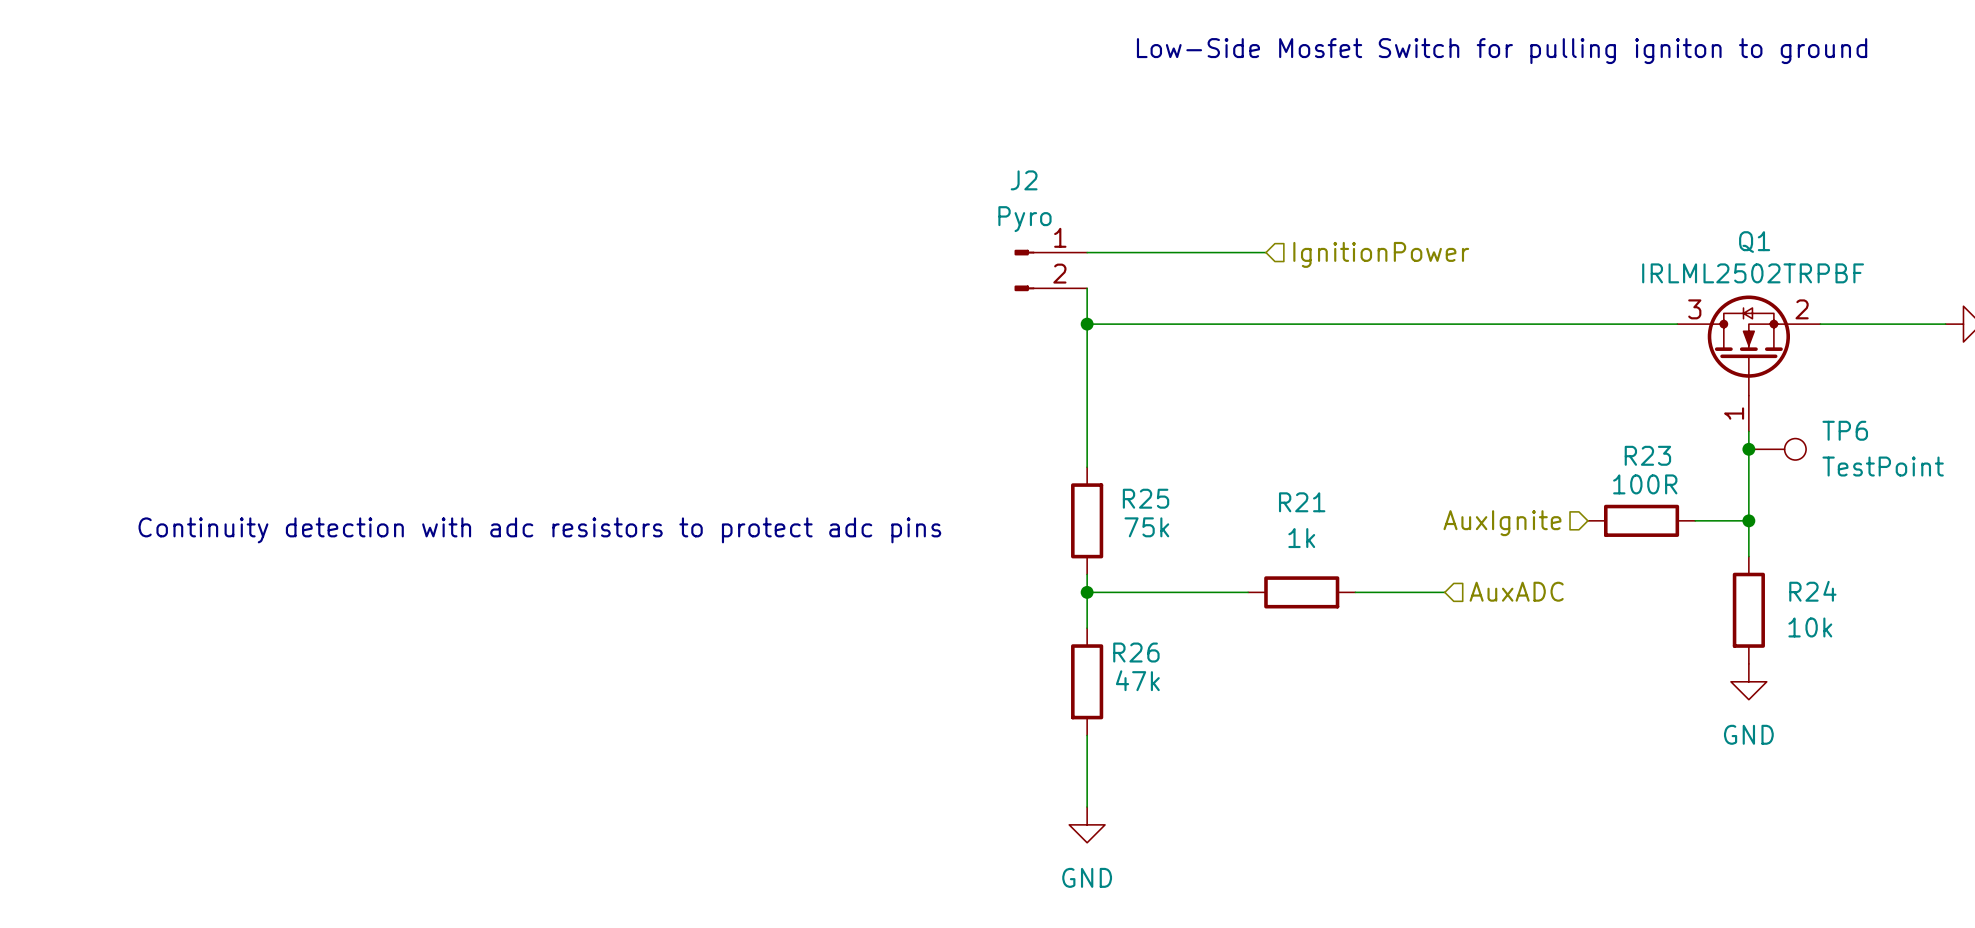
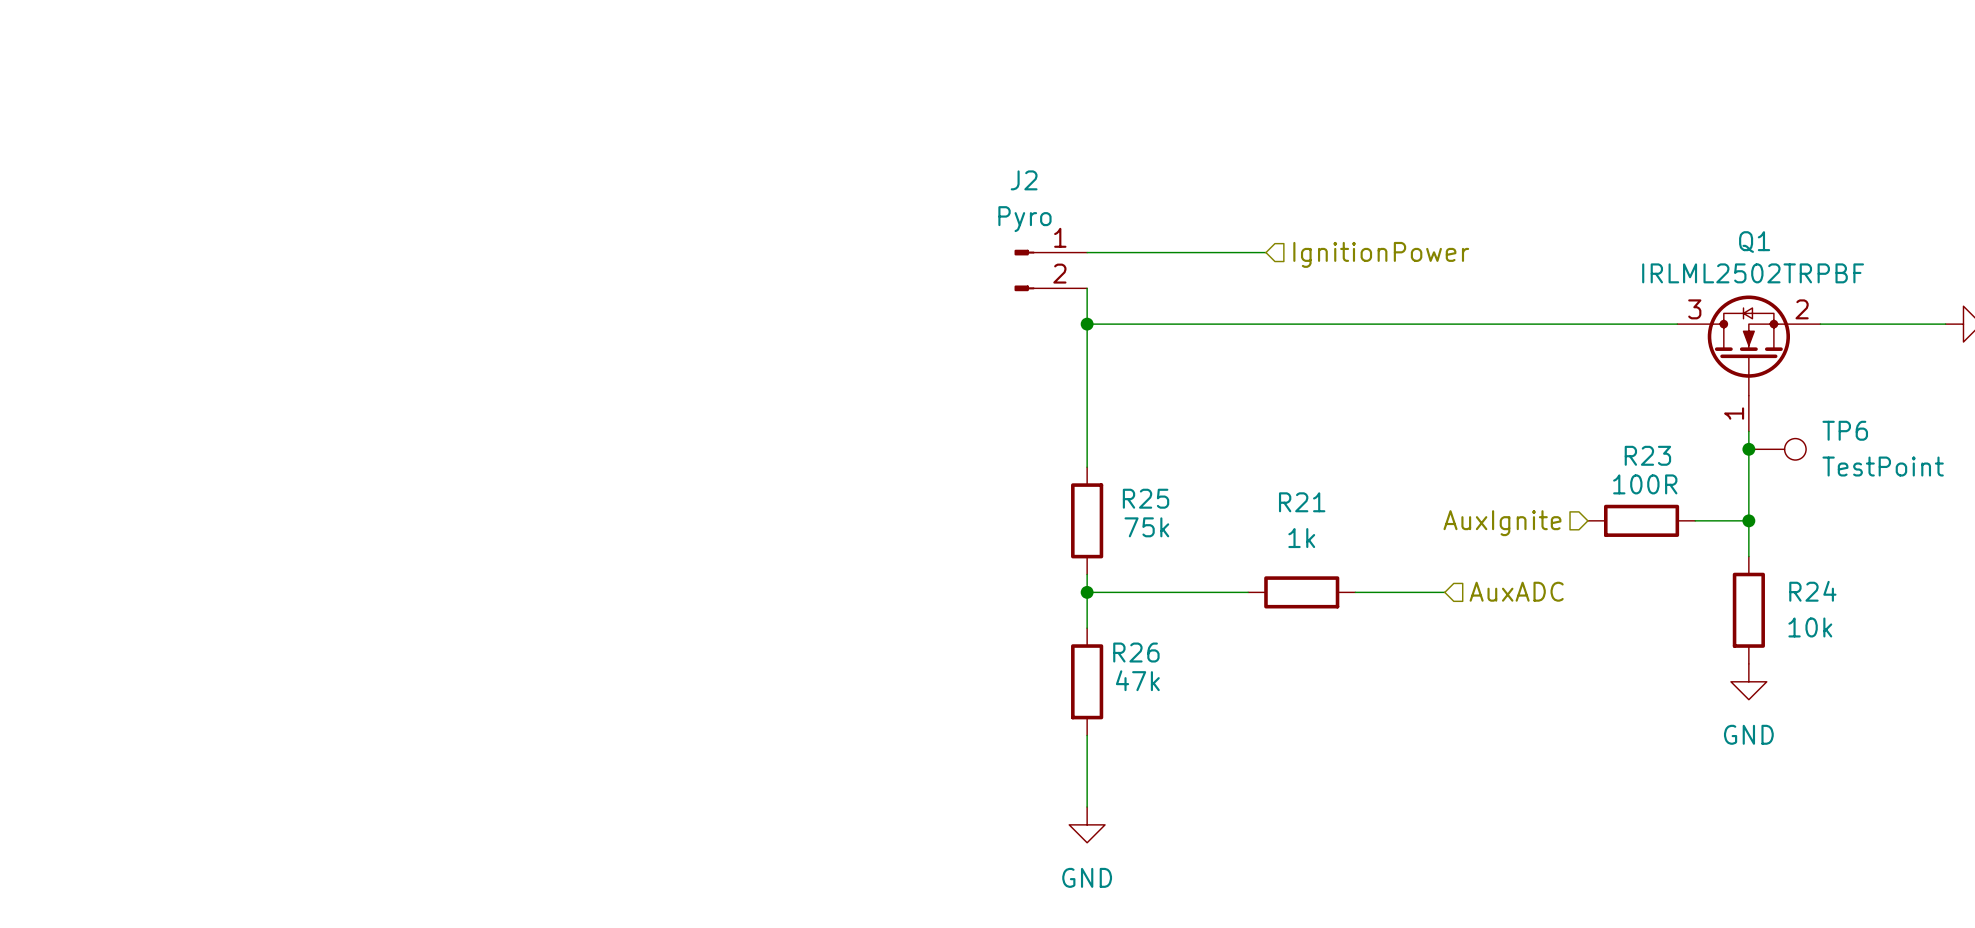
text: Low-Side Mosfet Switch for pulling igniton to ground (1502, 51) -> none
text: Continuity detection with adc resistors to protect adc pins (539, 530) -> none

